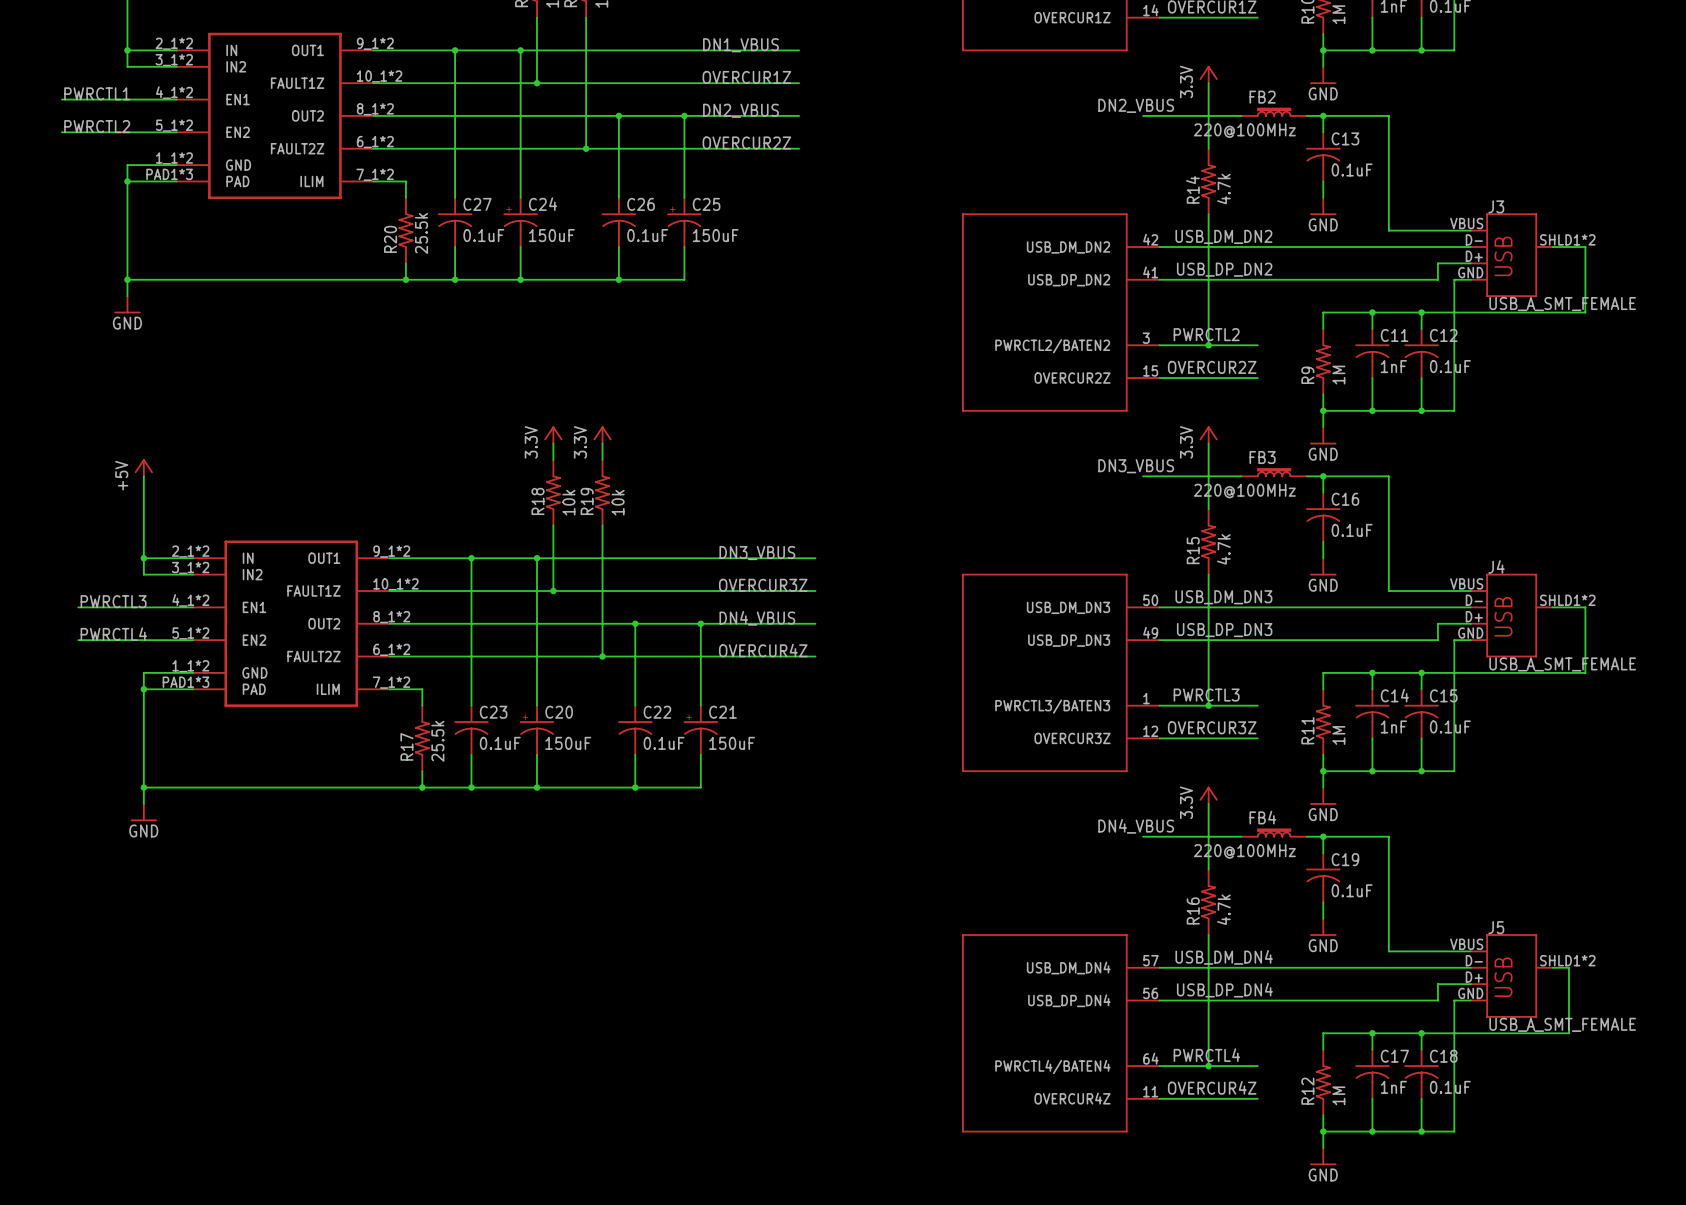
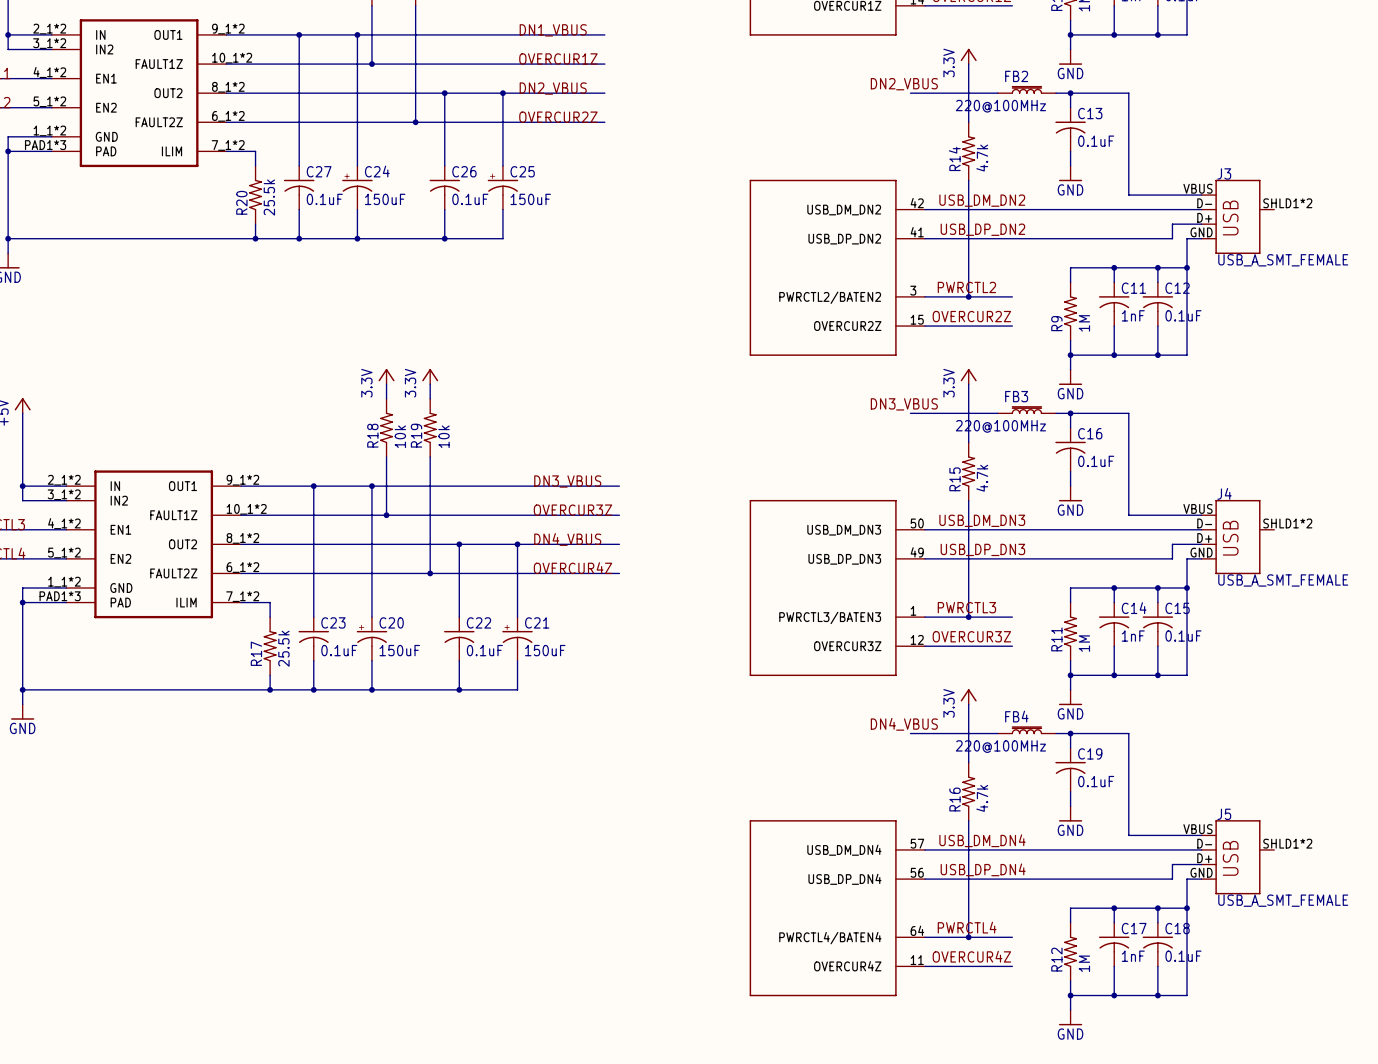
wire: (1552, 247) (1585, 247) (1585, 312) (1454, 312) -> none
junction: none -> (1187, 267)
wire: (1552, 607) (1585, 607) (1585, 672) (1454, 672) -> none
junction: none -> (1187, 588)
wire: (1552, 967) (1569, 967) (1569, 1033) (1454, 1033) -> none
junction: none -> (1187, 908)

